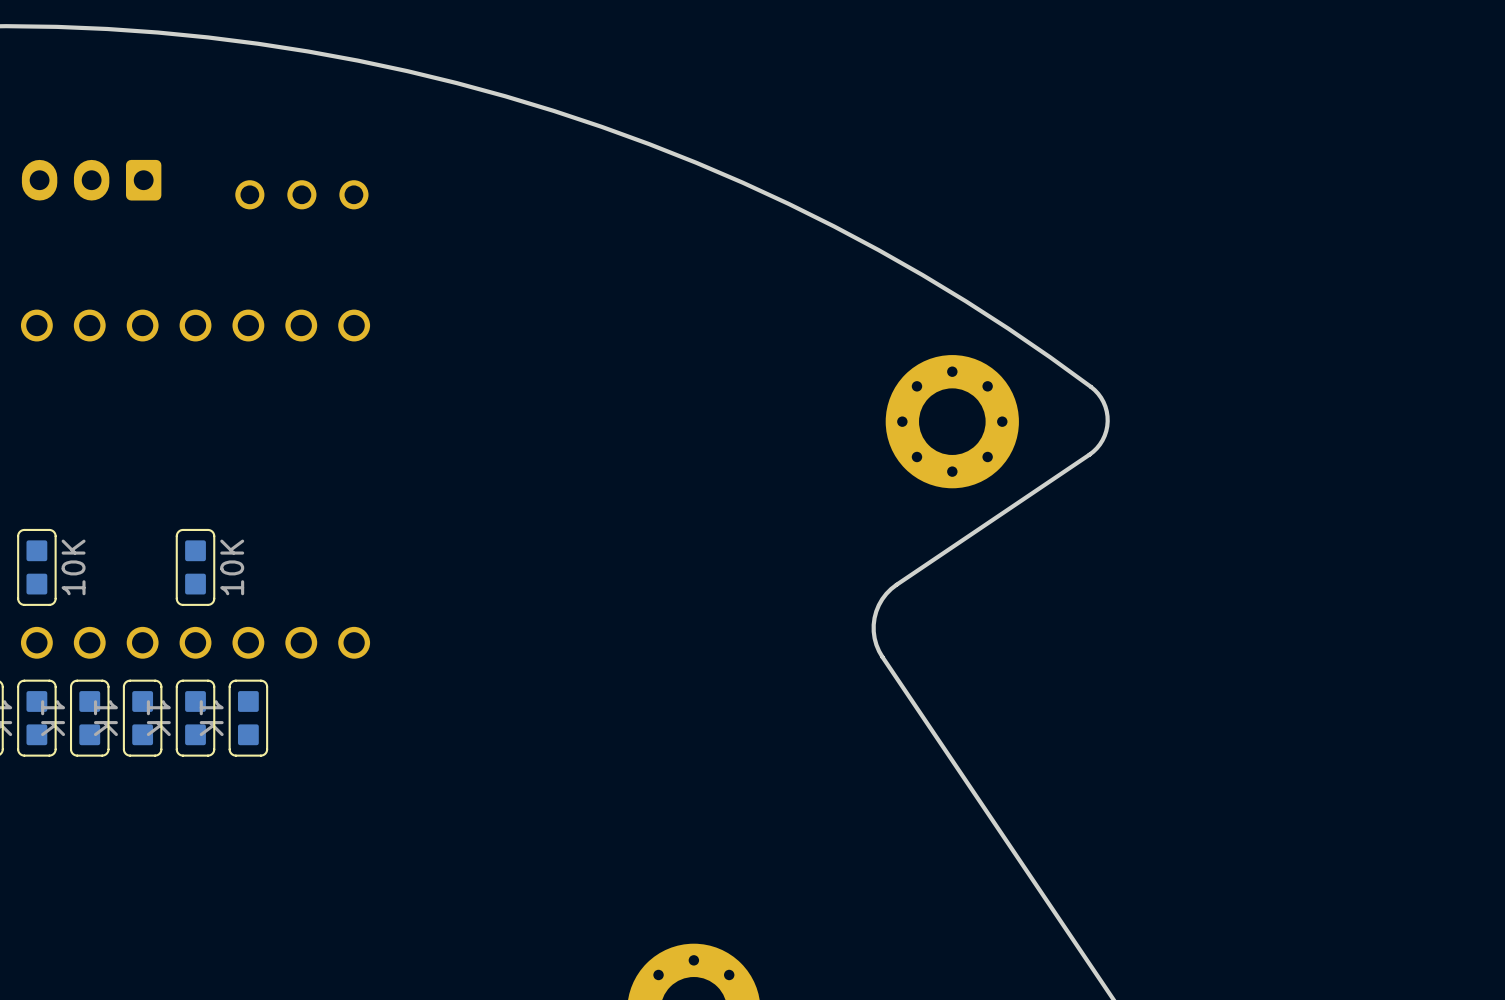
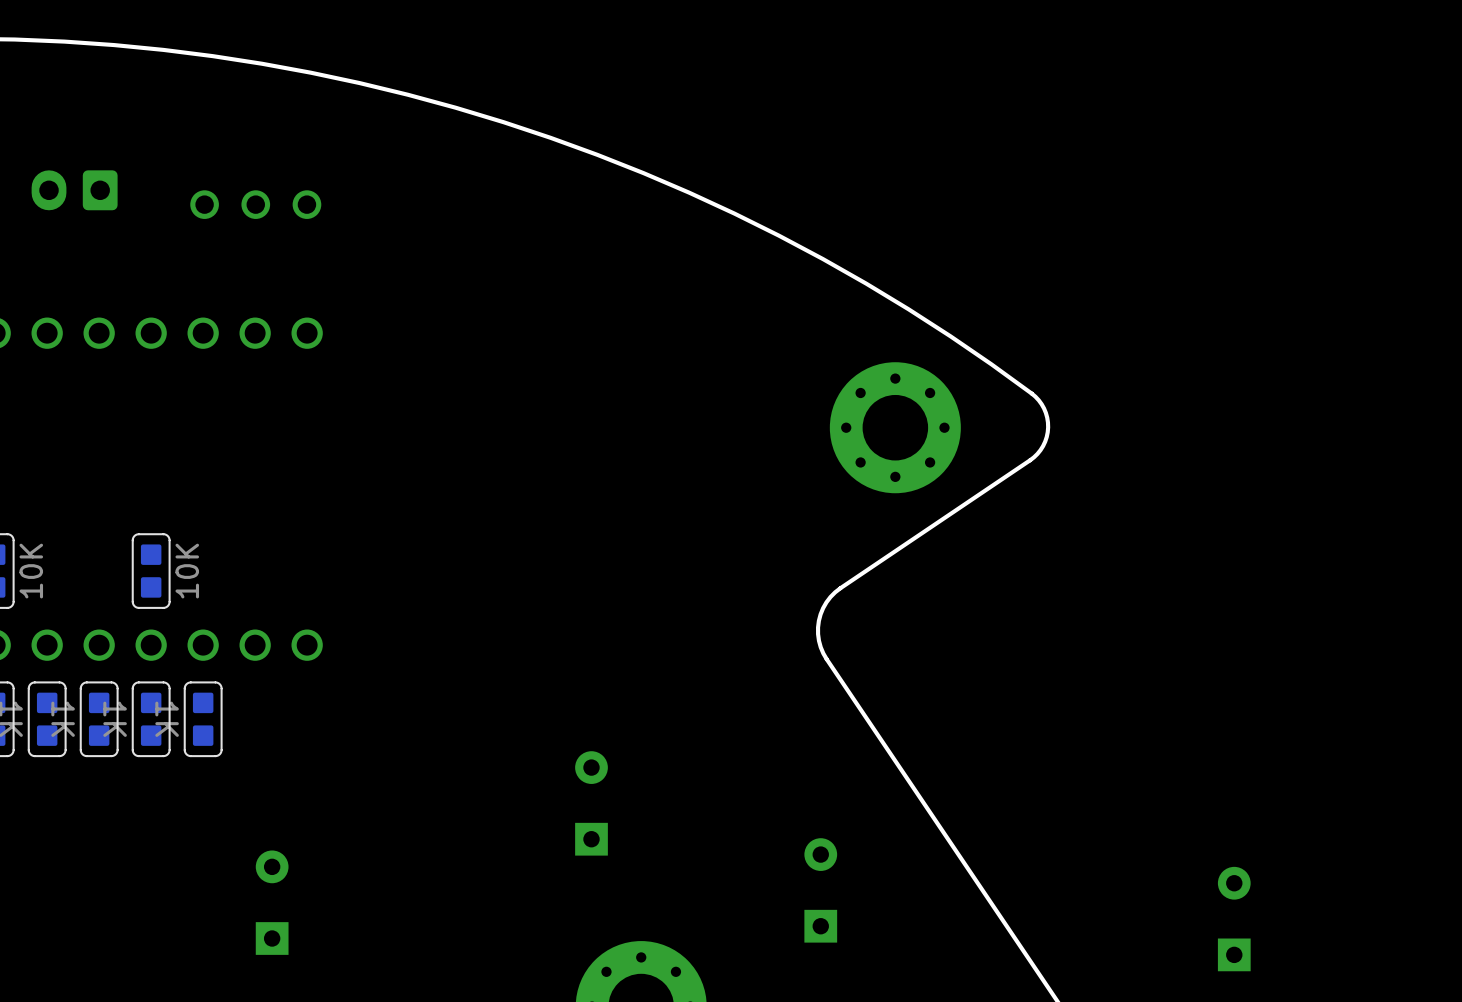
part: none -> (591, 803)
part: none -> (820, 890)
part: none -> (272, 902)
part: none -> (1234, 919)

